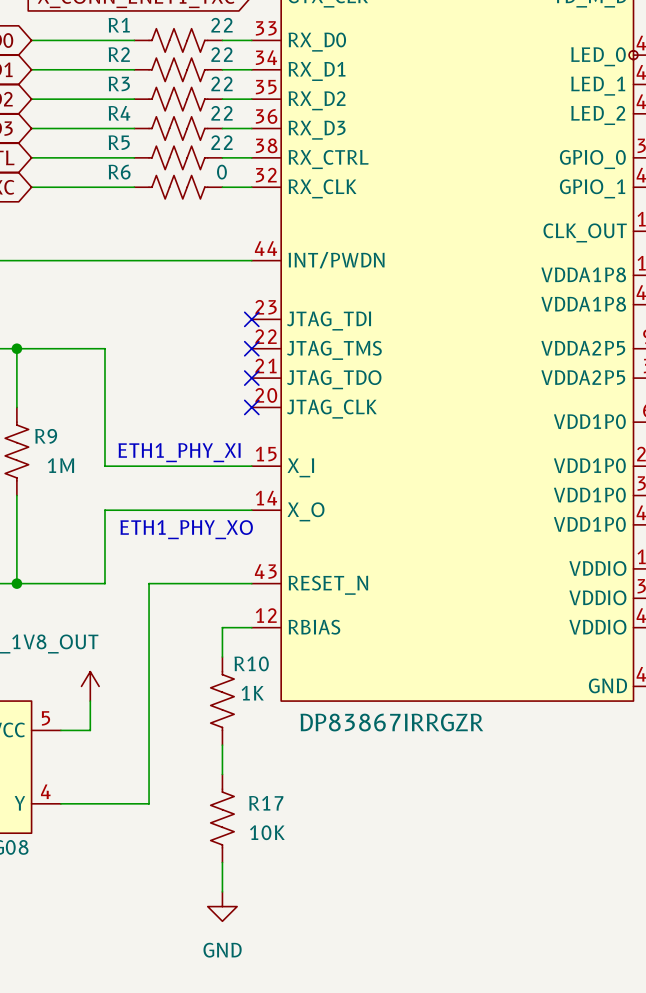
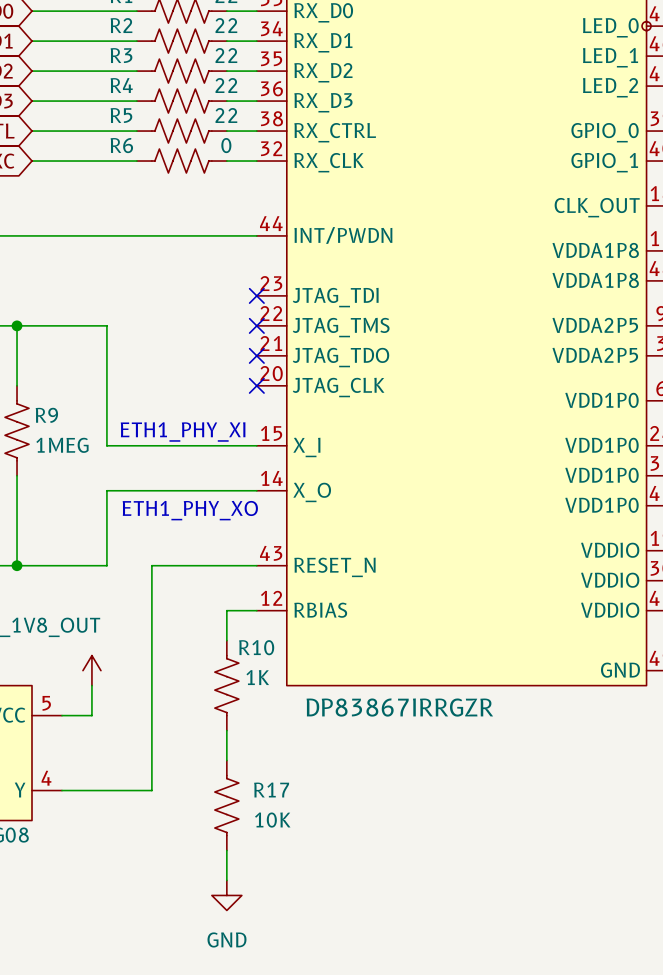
R9 value: 1M (60, 465) -> 1MEG (62, 445)

